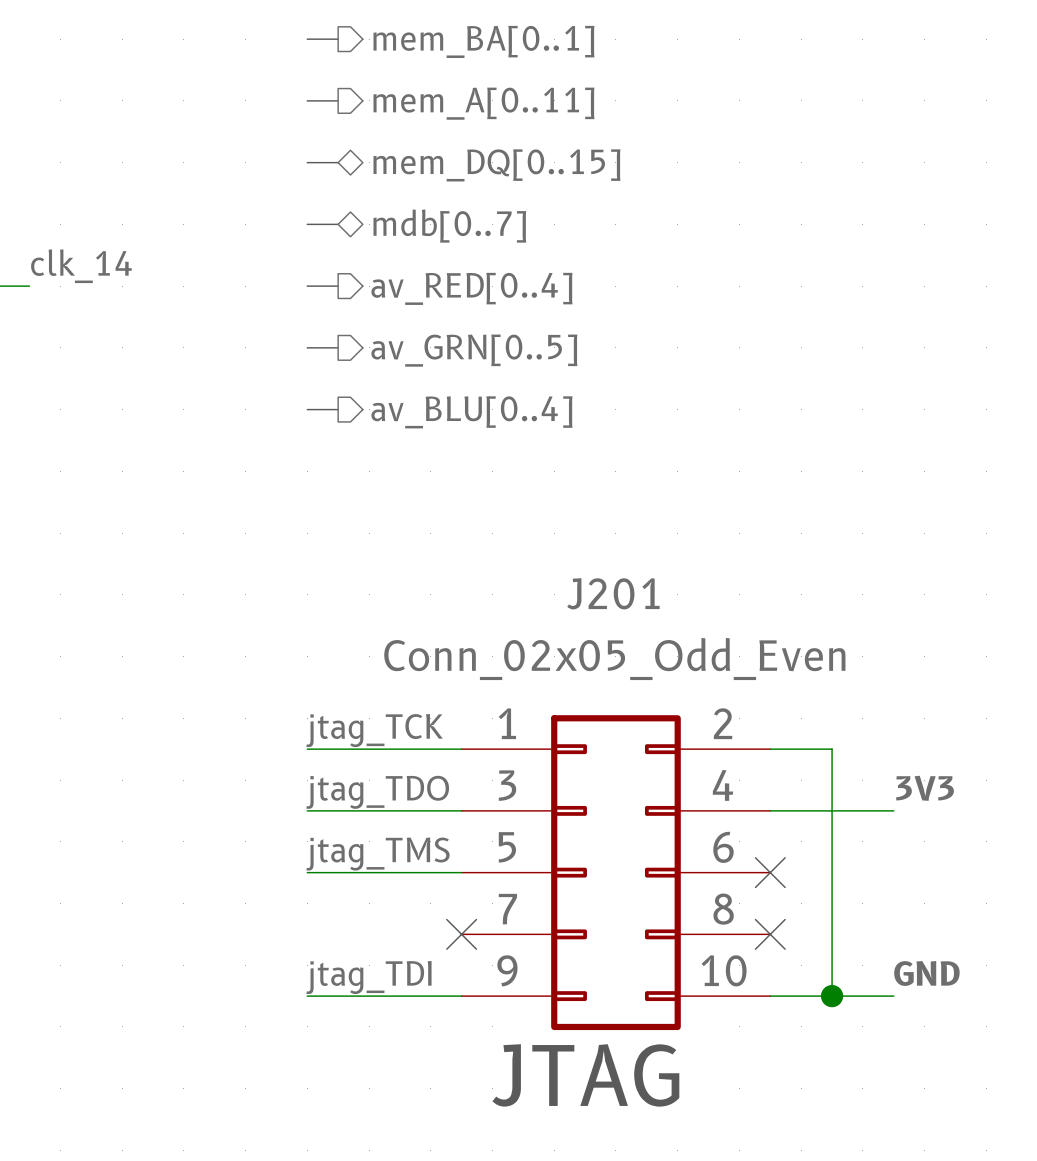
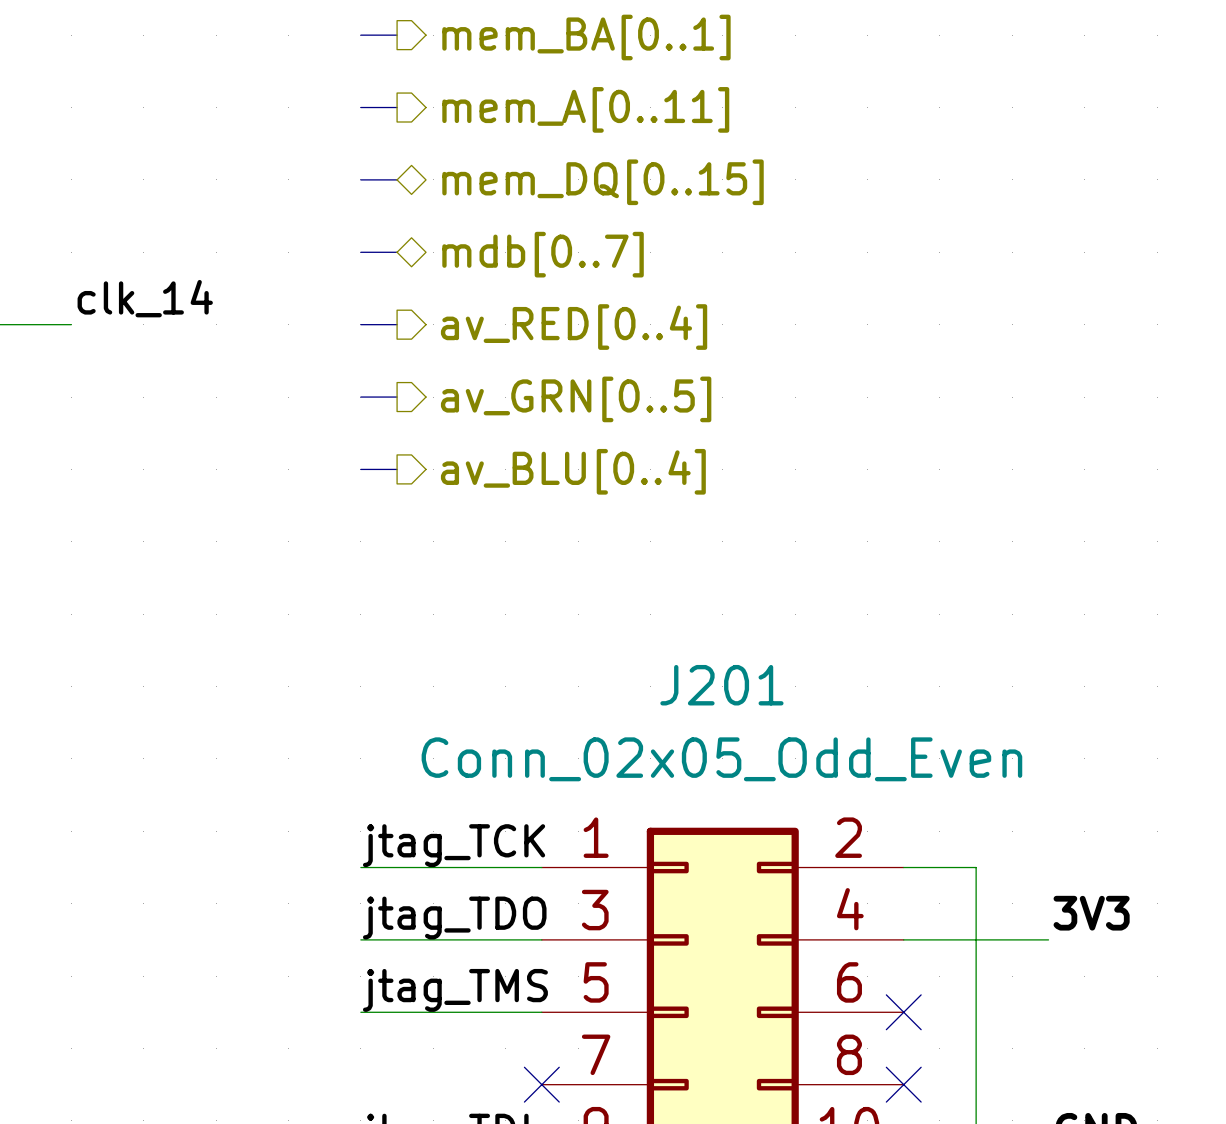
label position: clk_14 (81, 266) -> clk_14 (145, 298)
wire: none -> (35, 324) (71, 324)

